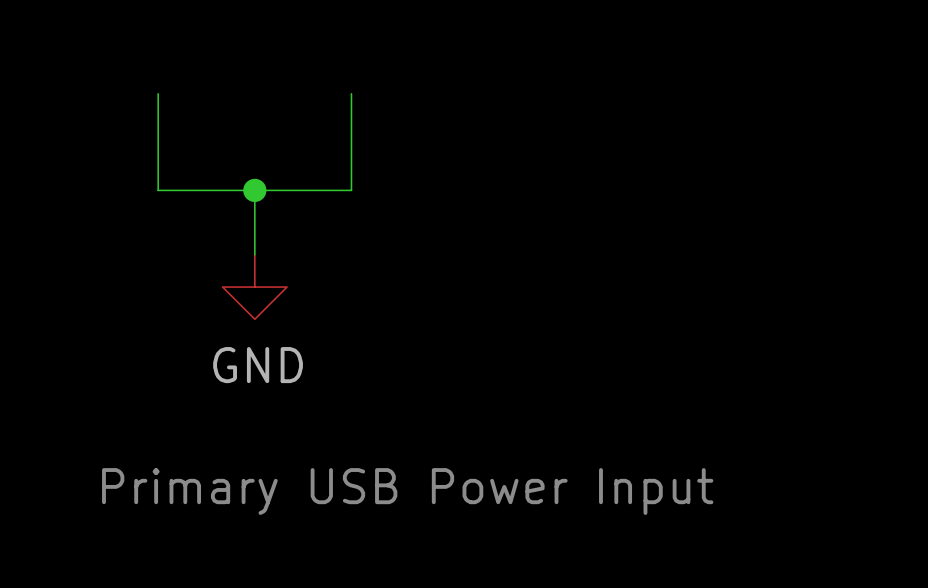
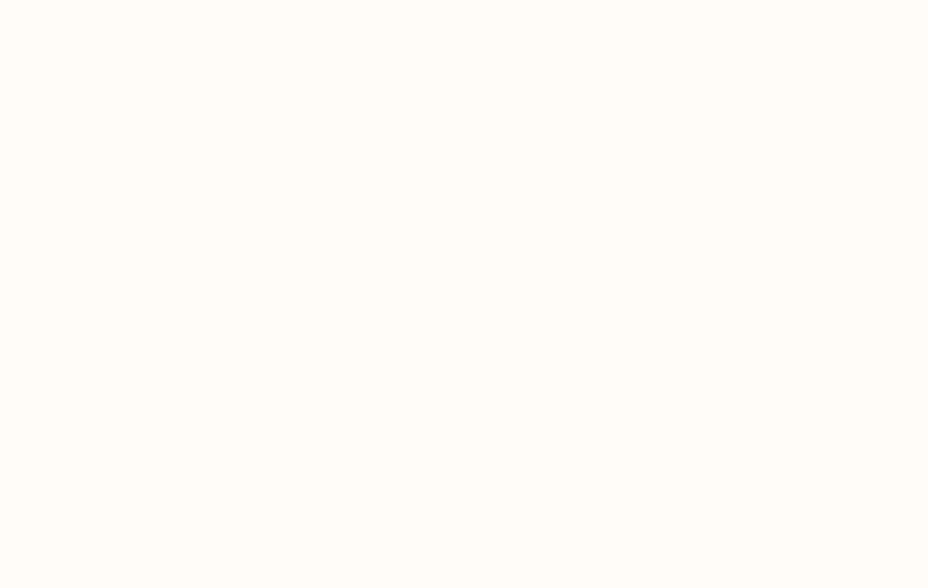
wire: (158, 93) (158, 190) (351, 190) (351, 93) -> none
wire: (254, 190) (254, 254) -> none
junction: (254, 190) -> none
power symbol: GND (254, 287) -> none
text: Primary USB Power Input (407, 491) -> none

